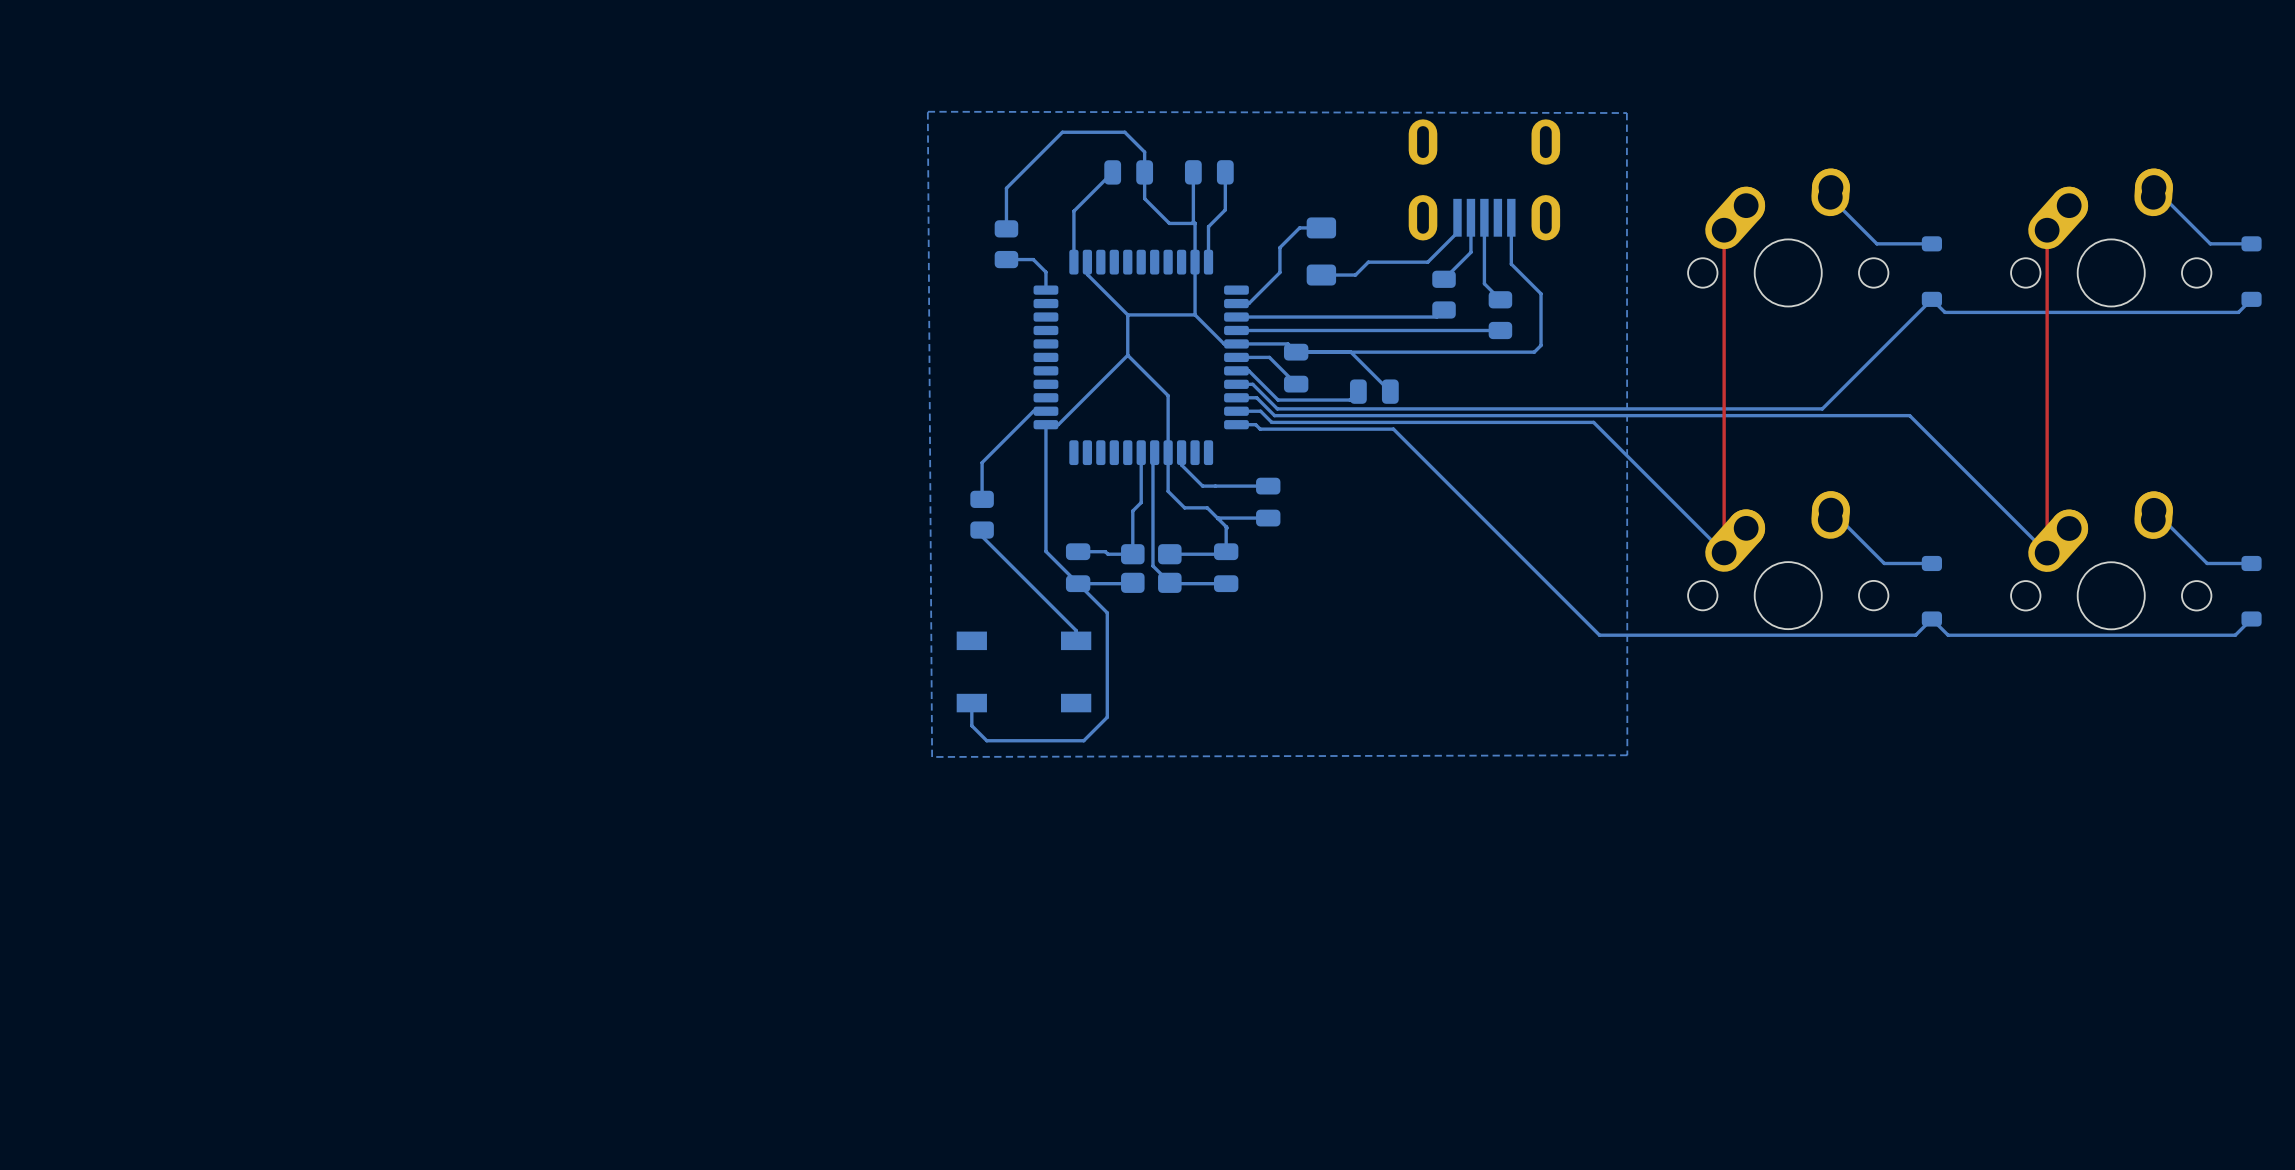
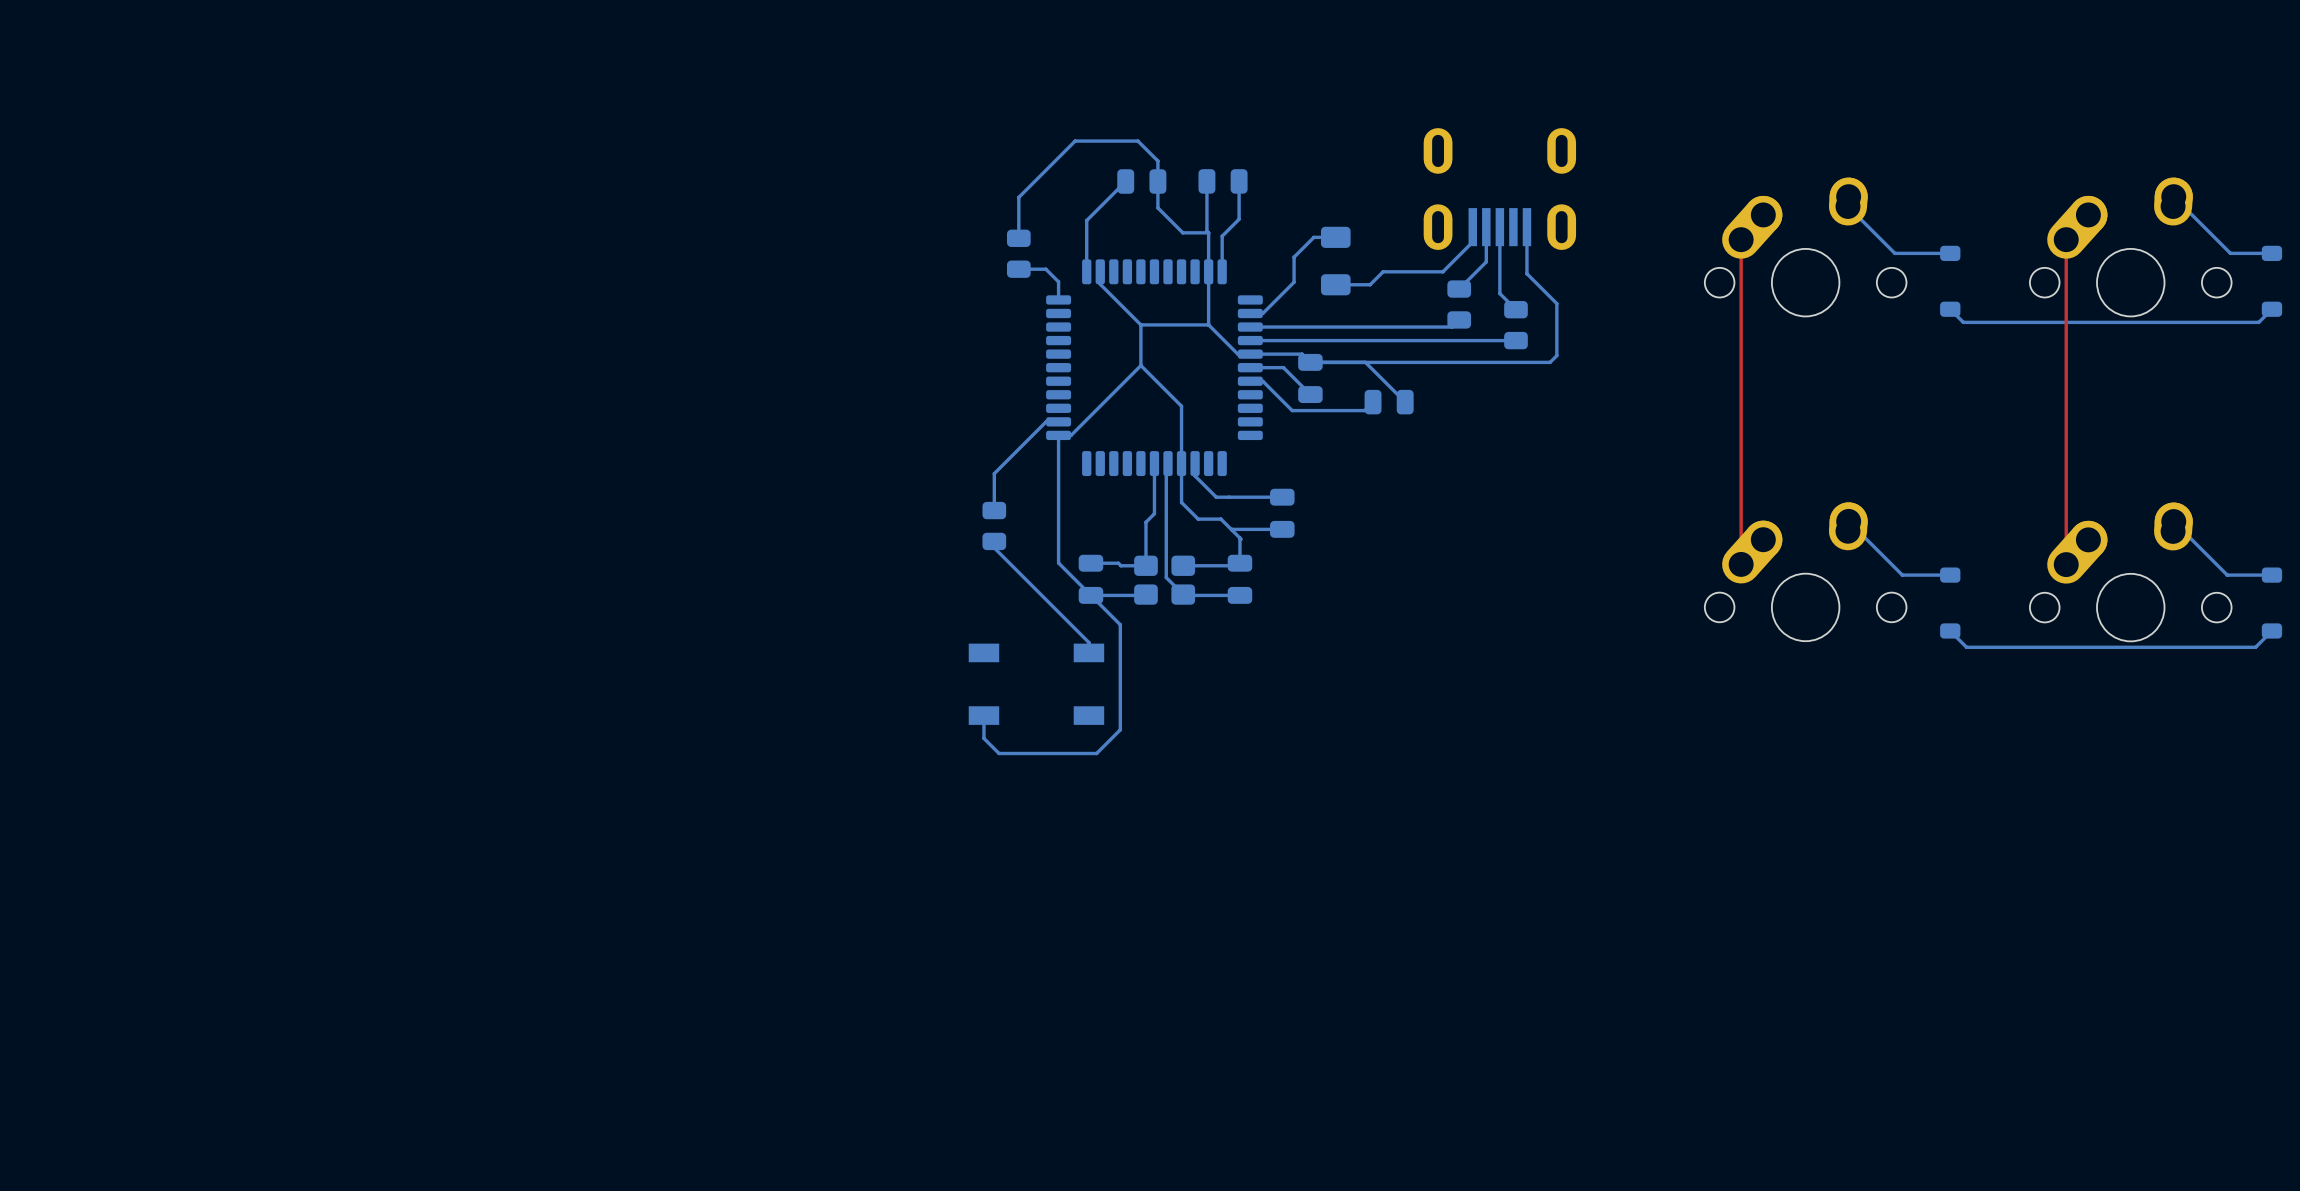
bottom zone outline: (927, 111) (1626, 113) (1627, 755) (932, 756) (927, 111) -> none
bottom track: (1931, 299) (1822, 408) (1277, 408) (1252, 384) (1236, 384) -> none
bottom track: (1236, 397) (1256, 397) (1274, 415) (1909, 415) (2047, 553) -> none
bottom track: (1236, 411) (1260, 411) (1271, 422) (1593, 422) (1724, 552) -> none
bottom track: (1236, 424) (1255, 424) (1260, 429) (1393, 429) (1599, 635) (1915, 635) (1931, 619) -> none

